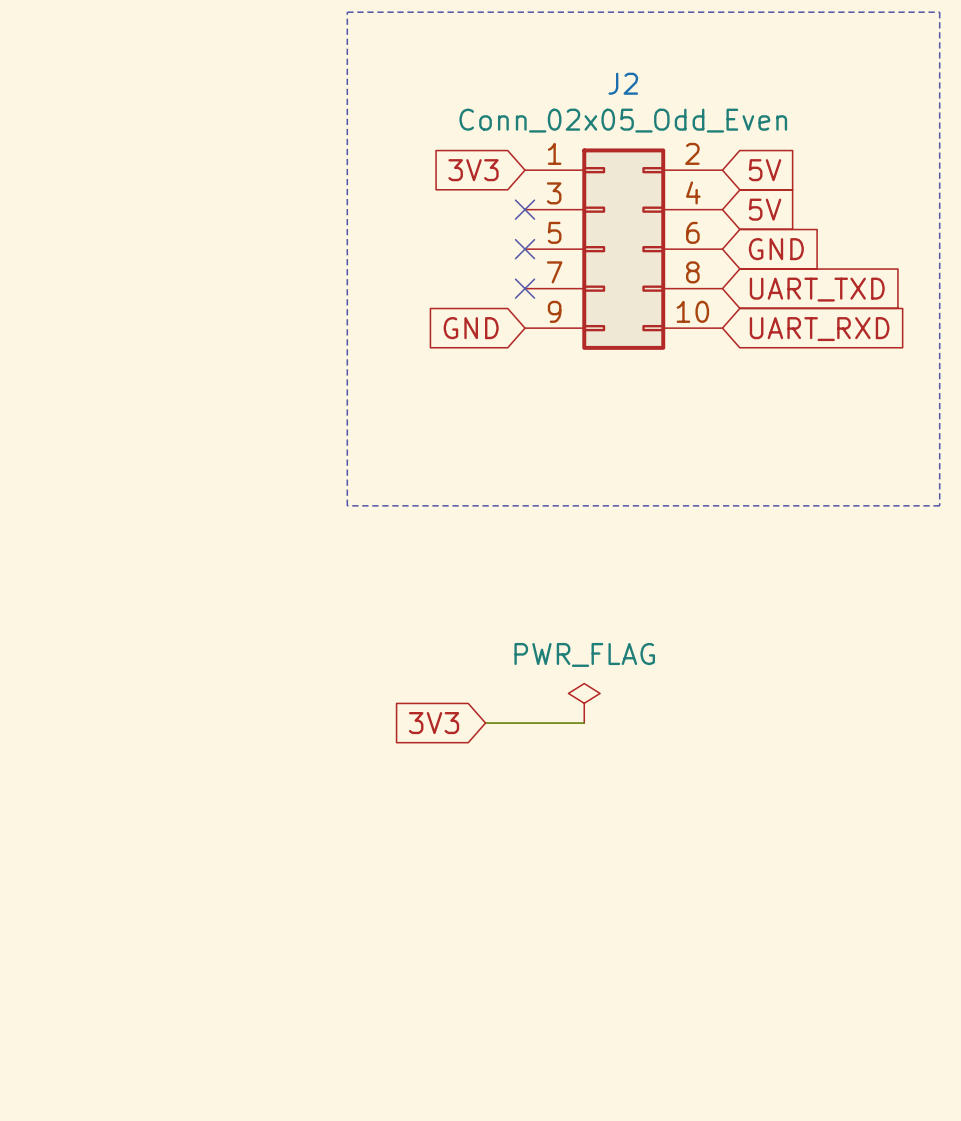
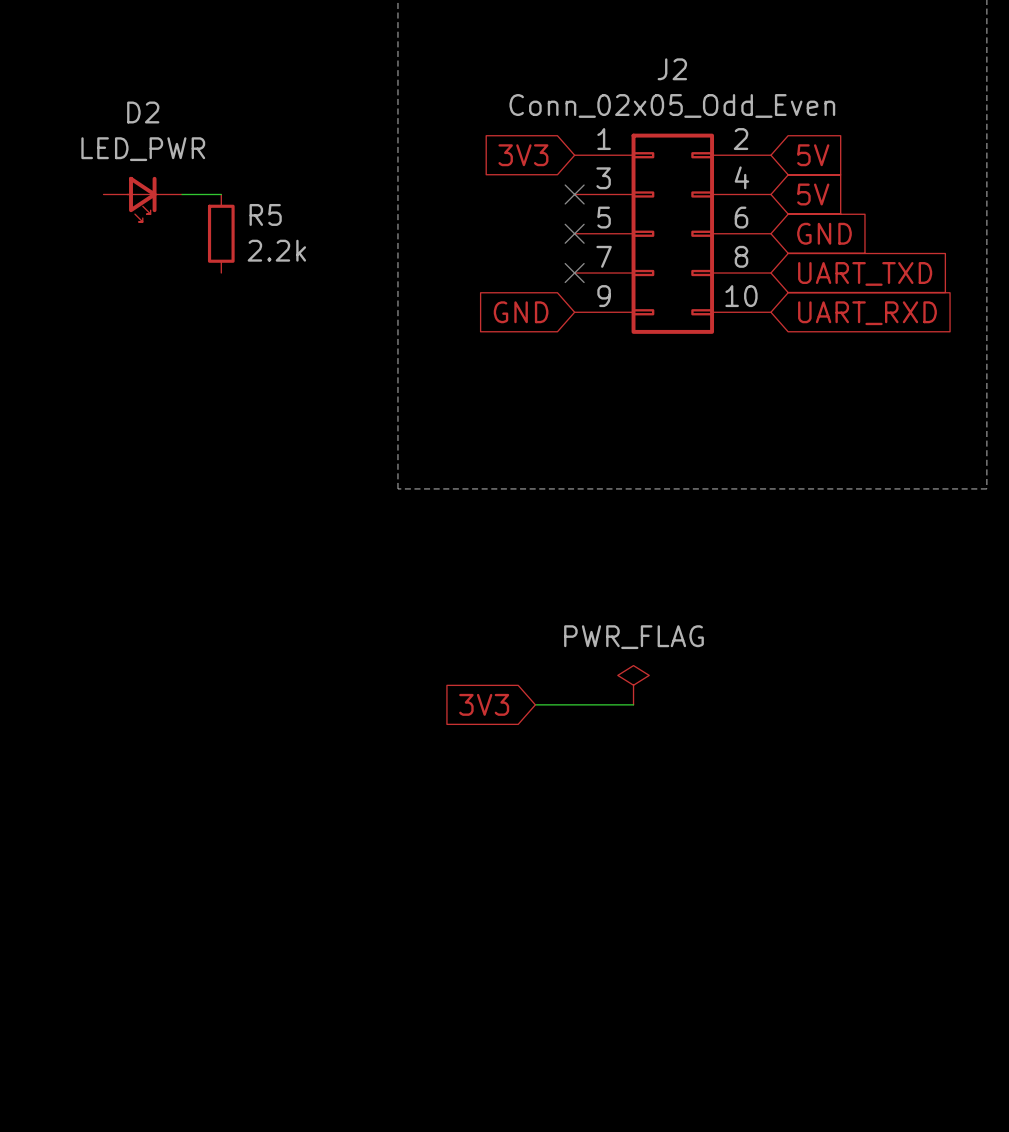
wire: none -> (182, 194) (221, 194)
D2: none -> LED_PWR (142, 199)
R5: none -> 2.2k (221, 233)

